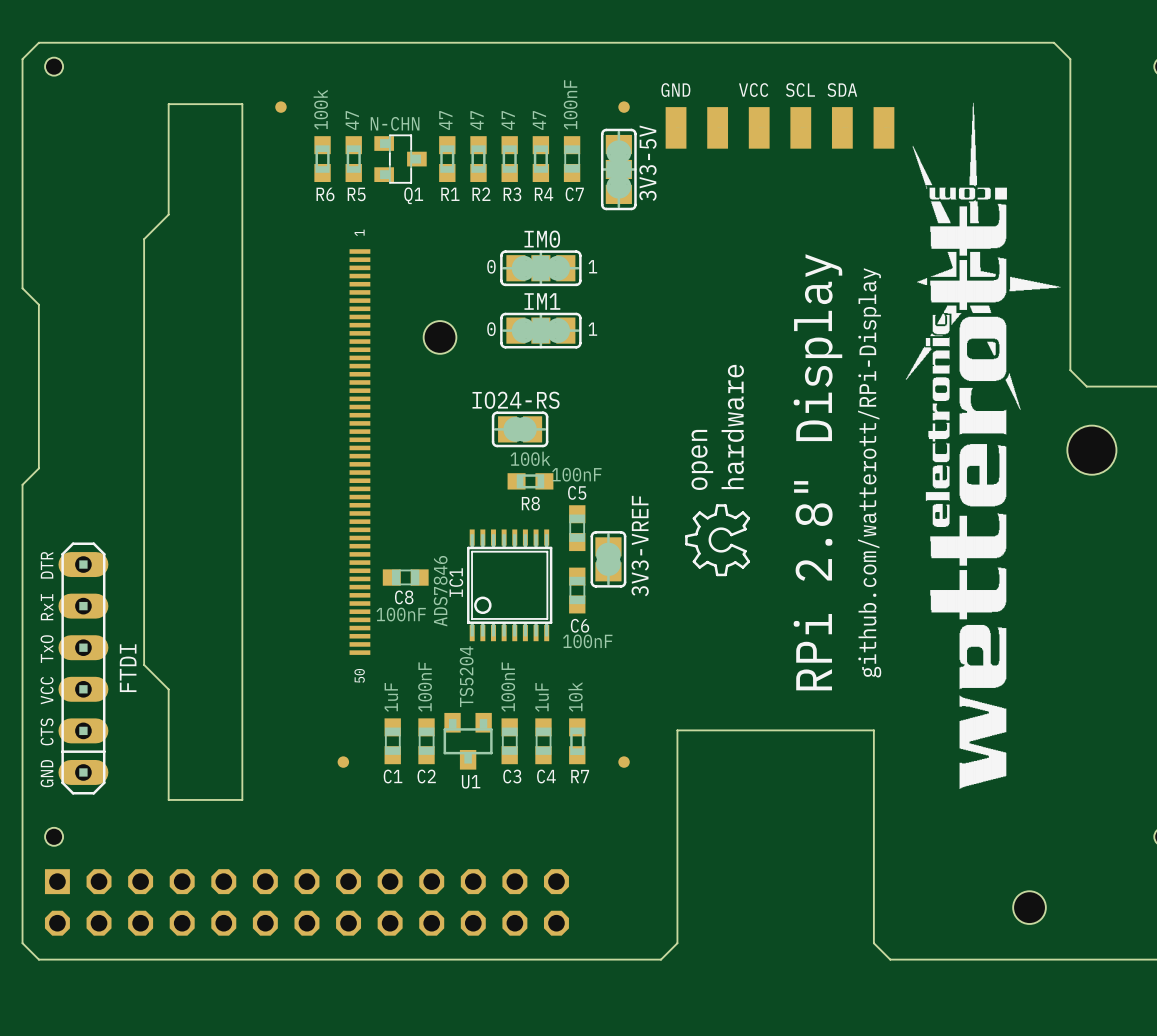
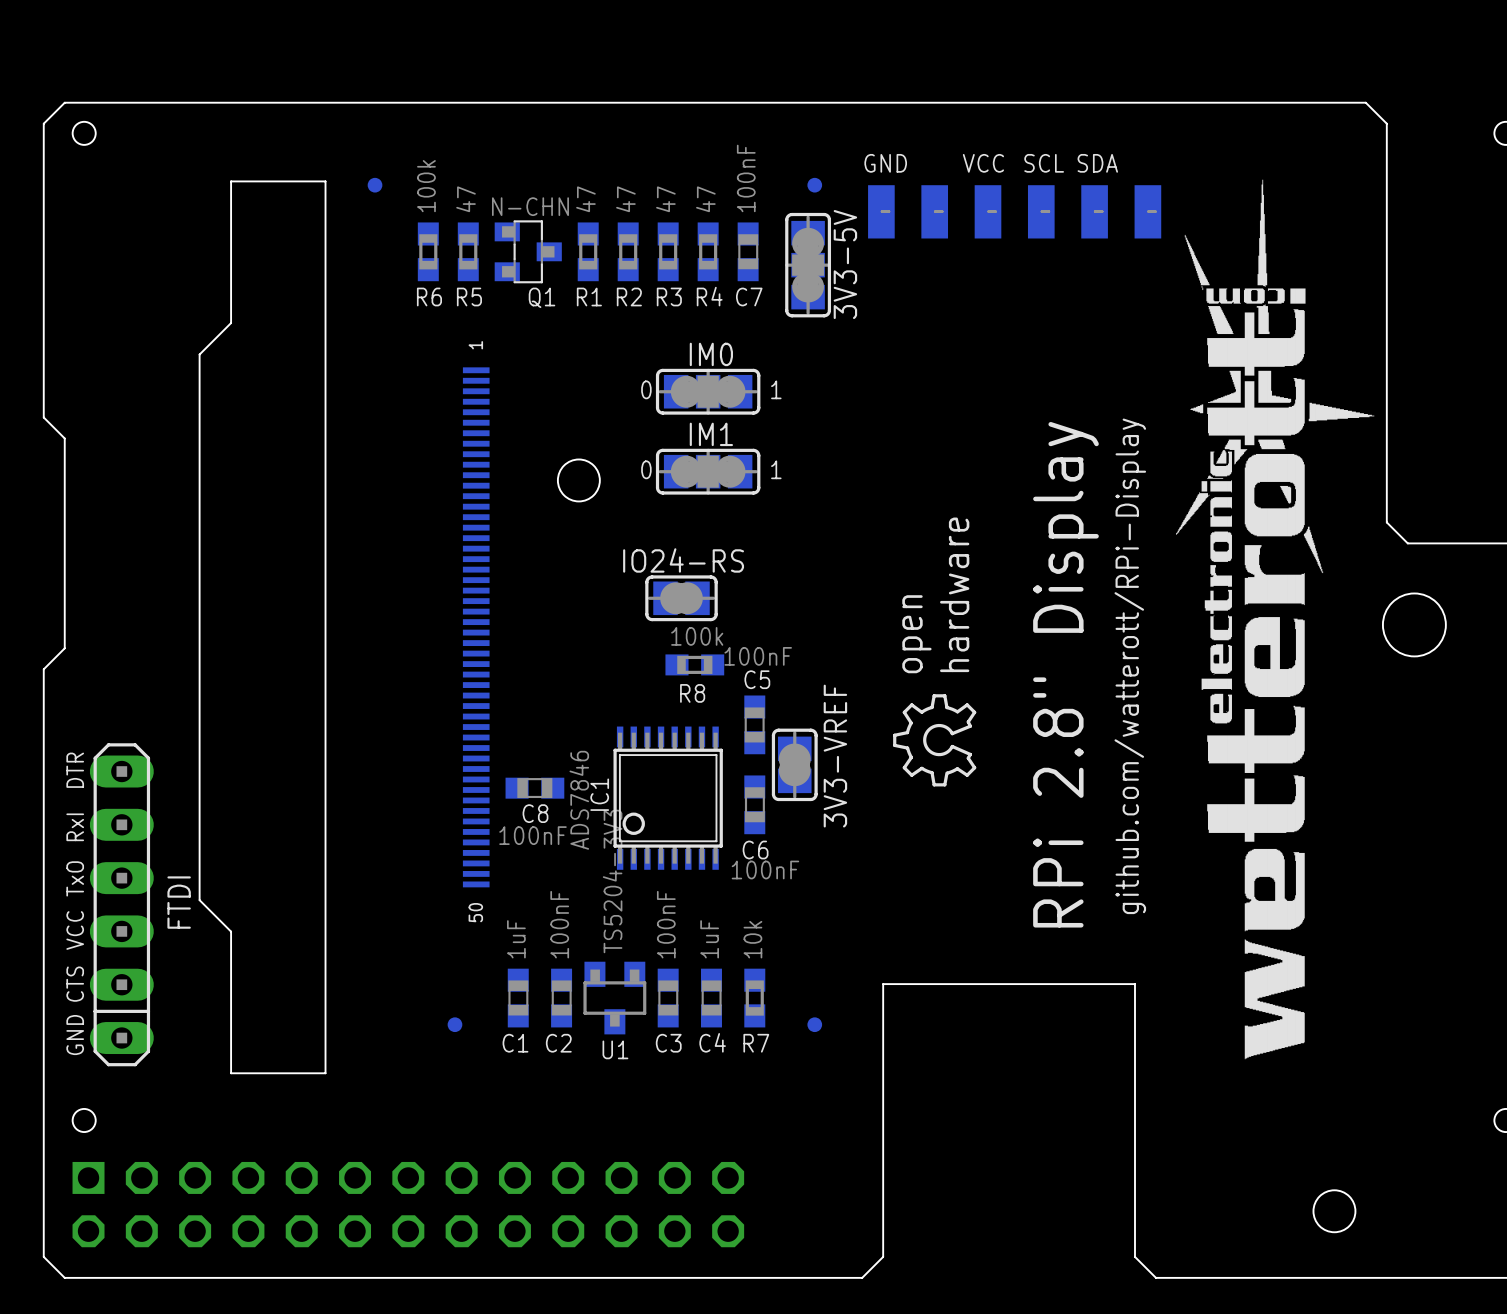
U1 value: TS5204 (466, 676) -> TS5204-3V3 (612, 881)

